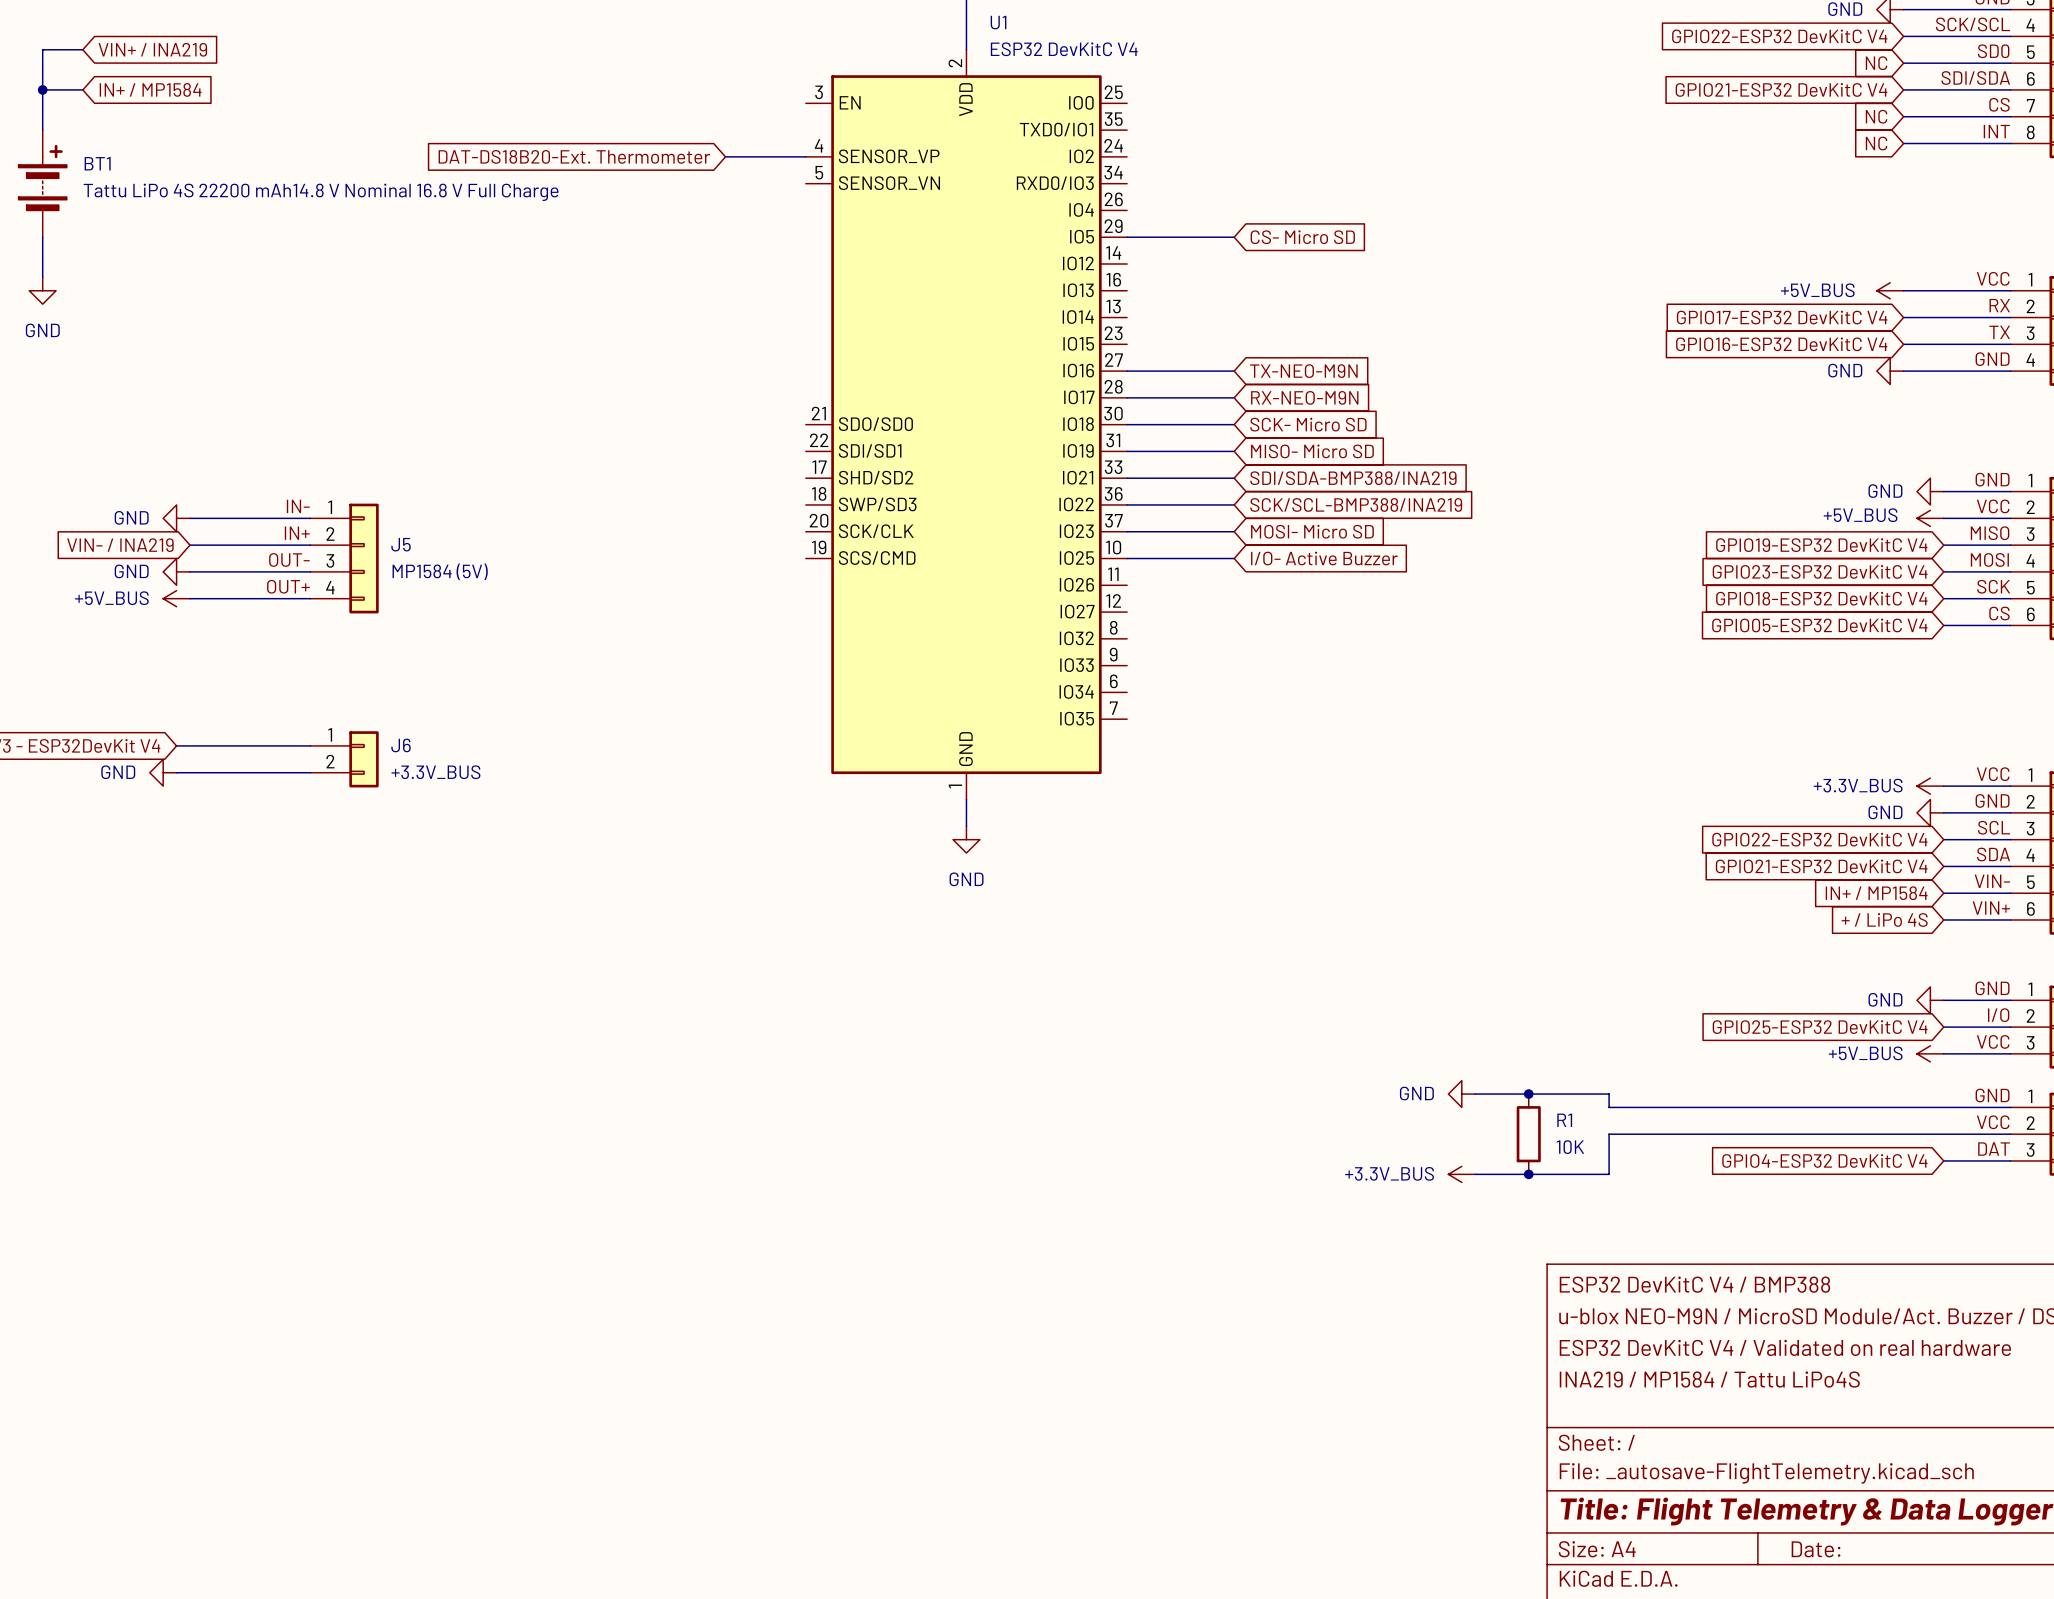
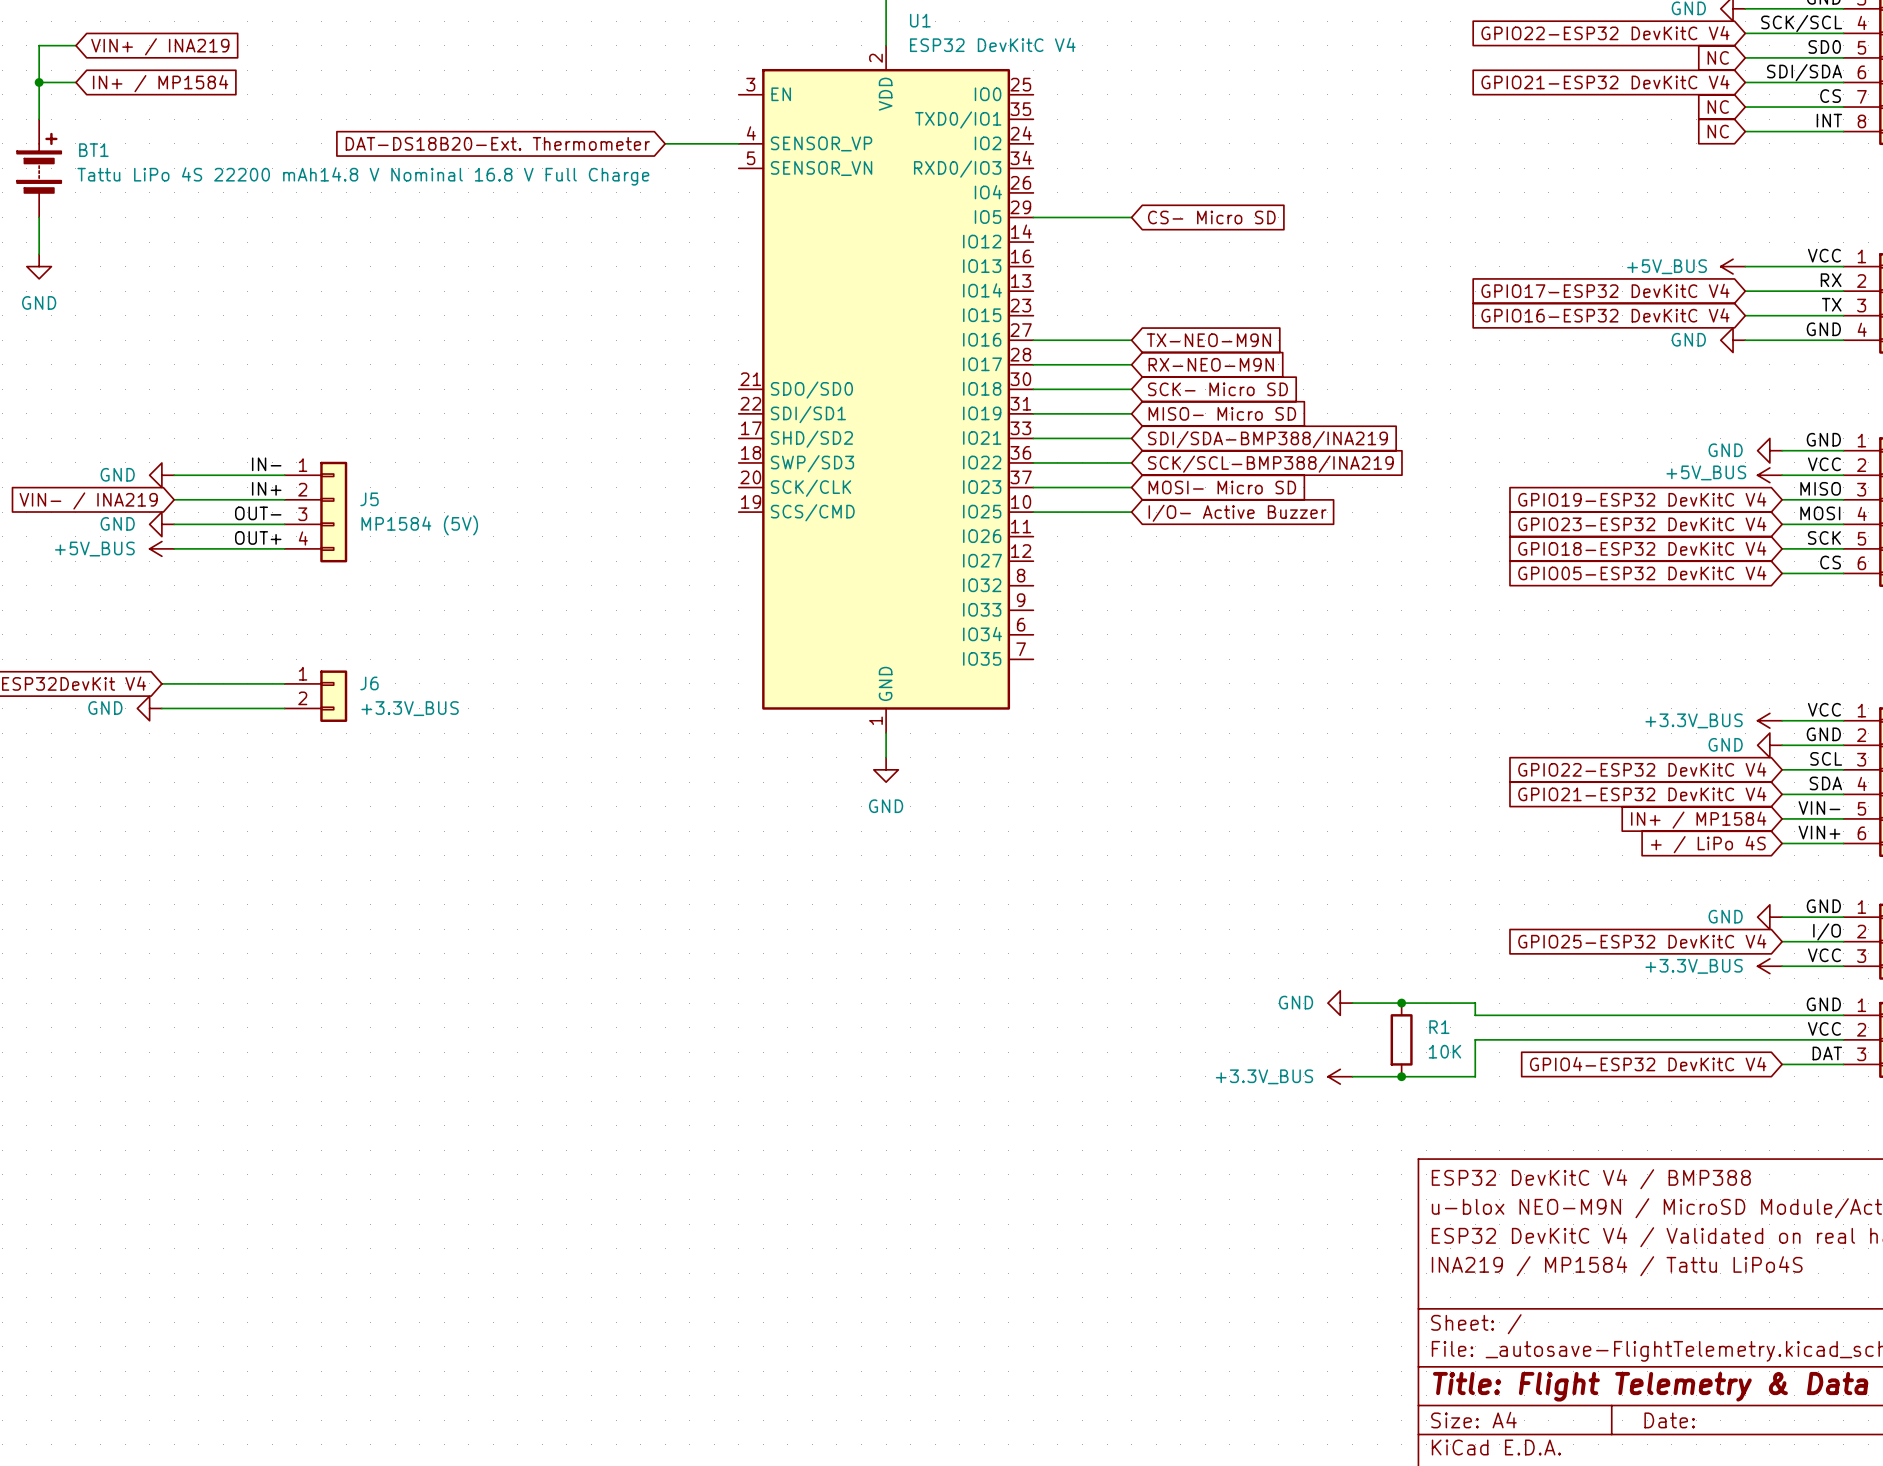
power symbol: +5V_BUS (1930, 1053) -> +3.3V_BUS (1769, 966)

